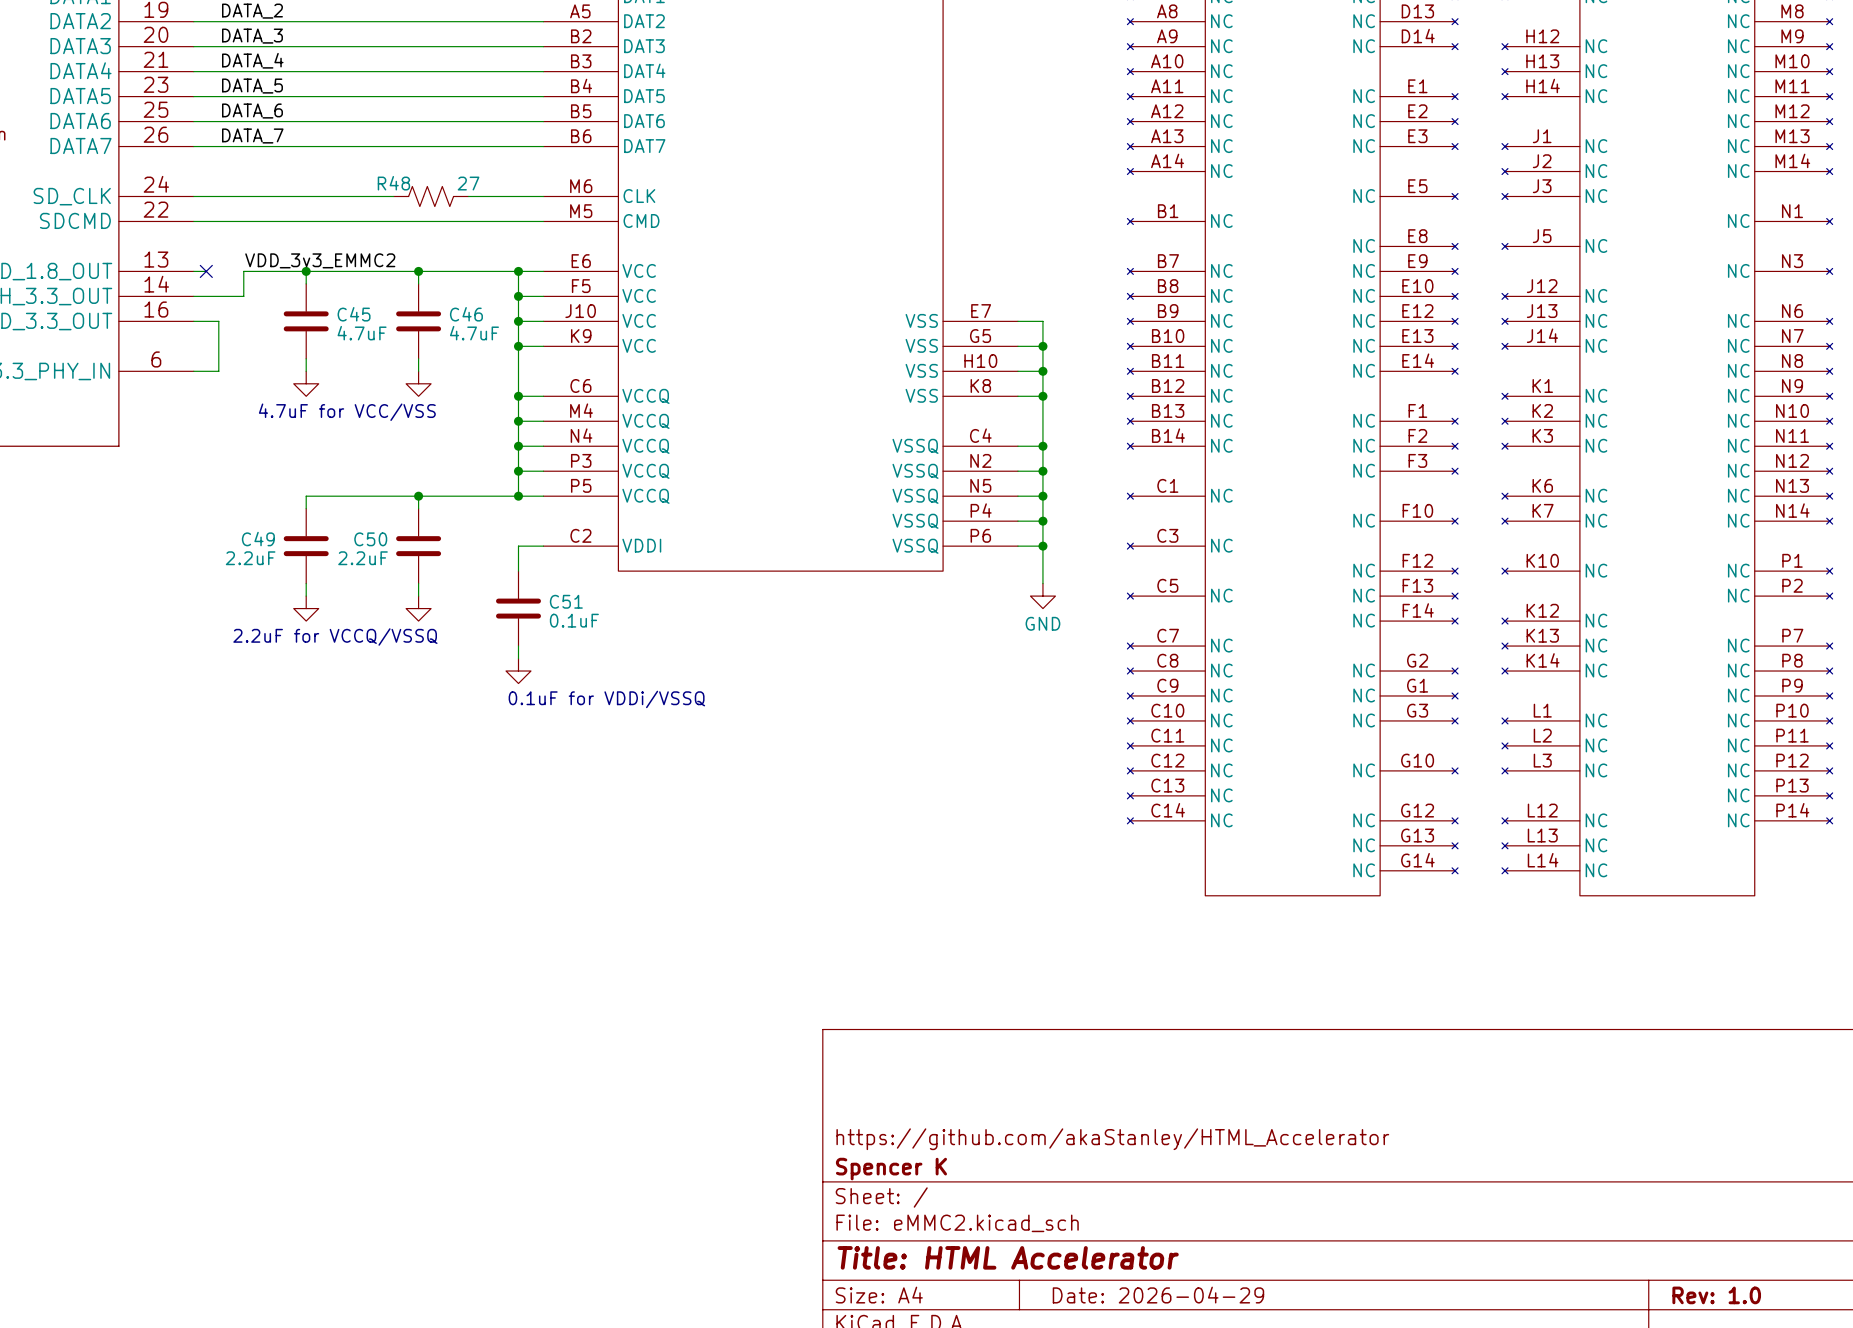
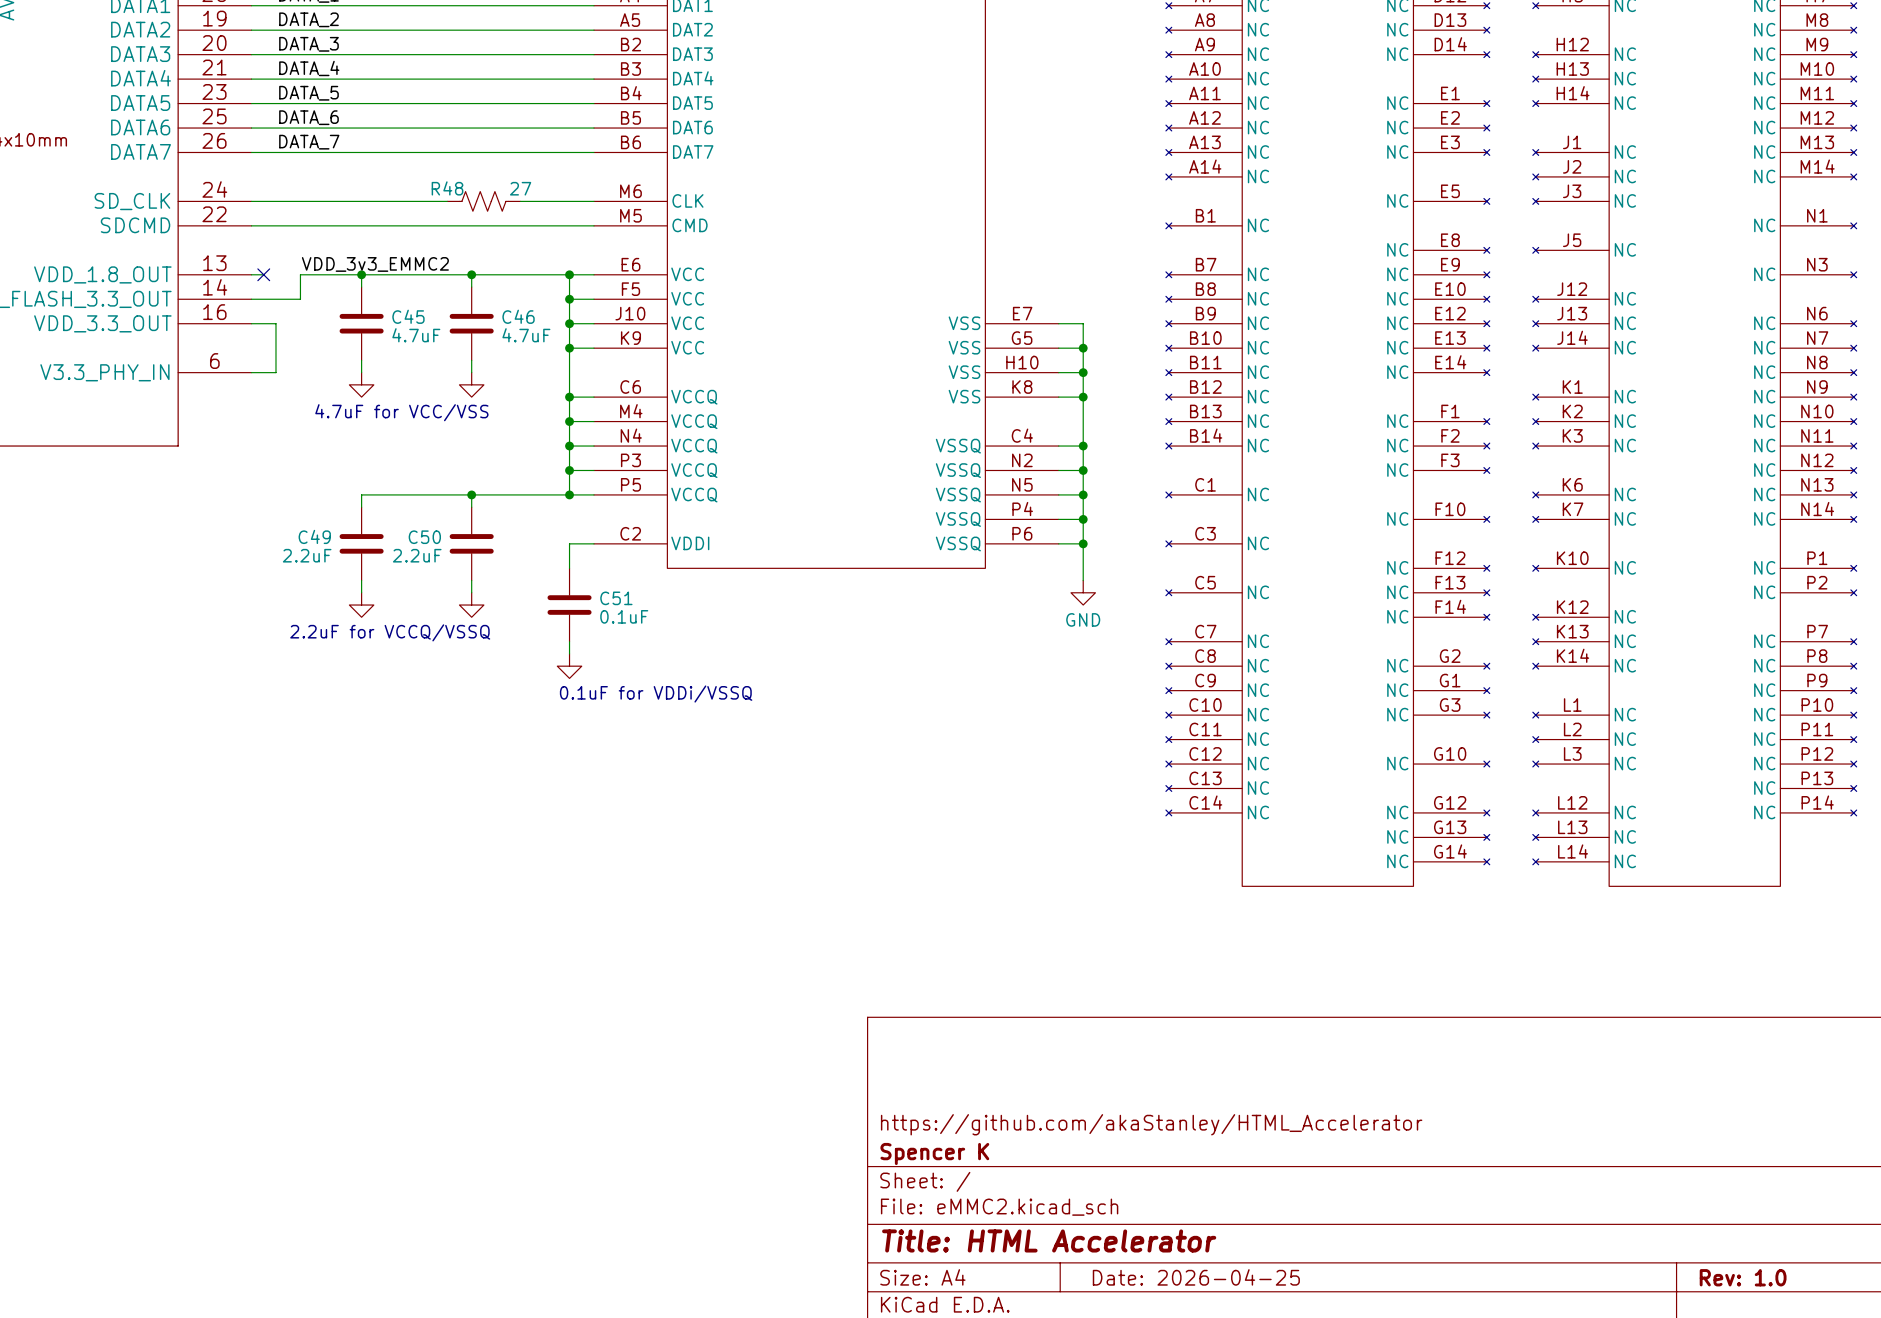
title block: Date: 2026-04-29 (1158, 1295) -> Date: 2026-04-25 (1196, 1277)

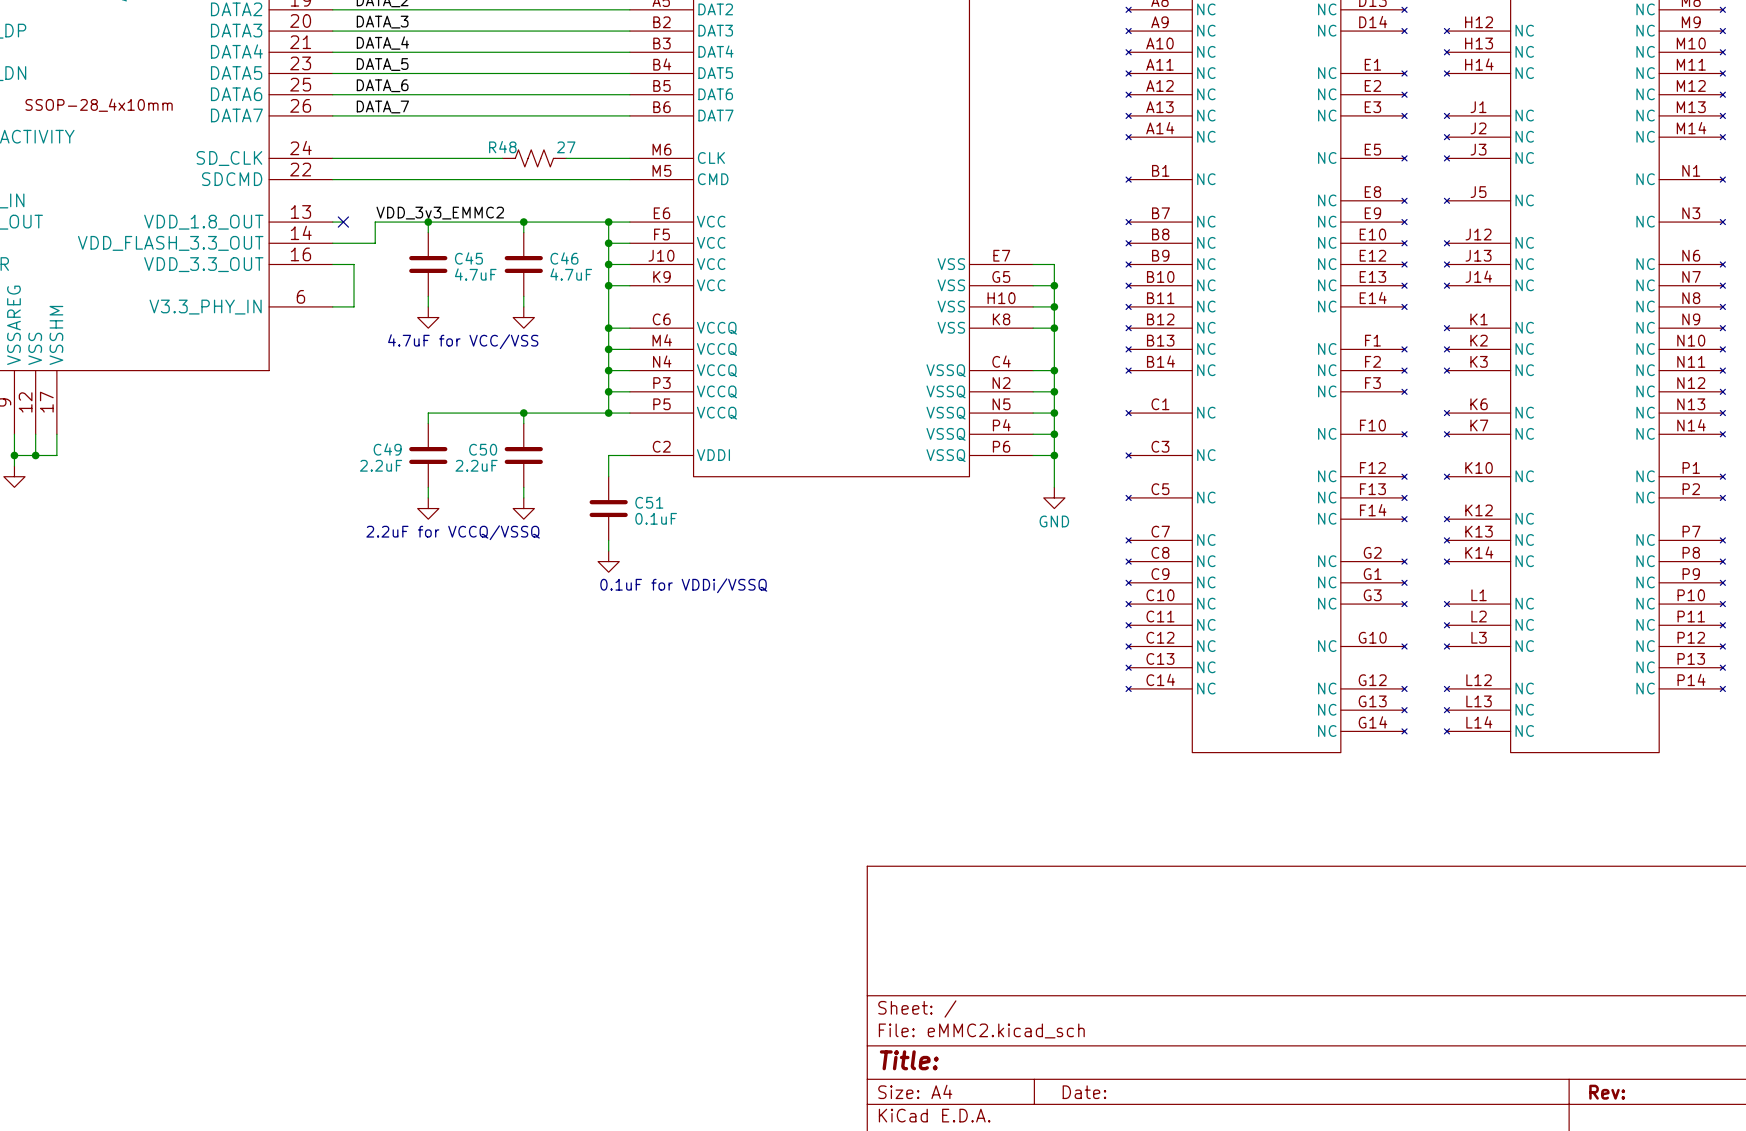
title block: https://github.com/akaStanley/HTML_Accelerator (1151, 1124) -> none
title block: Spencer K (934, 1154) -> none
title block: Title: HTML Accelerator (1049, 1240) -> Title: (909, 1060)
title block: Date: 2026-04-25 (1196, 1277) -> Date: (1084, 1092)
title block: Rev: 1.0 (1743, 1277) -> Rev: (1607, 1092)

